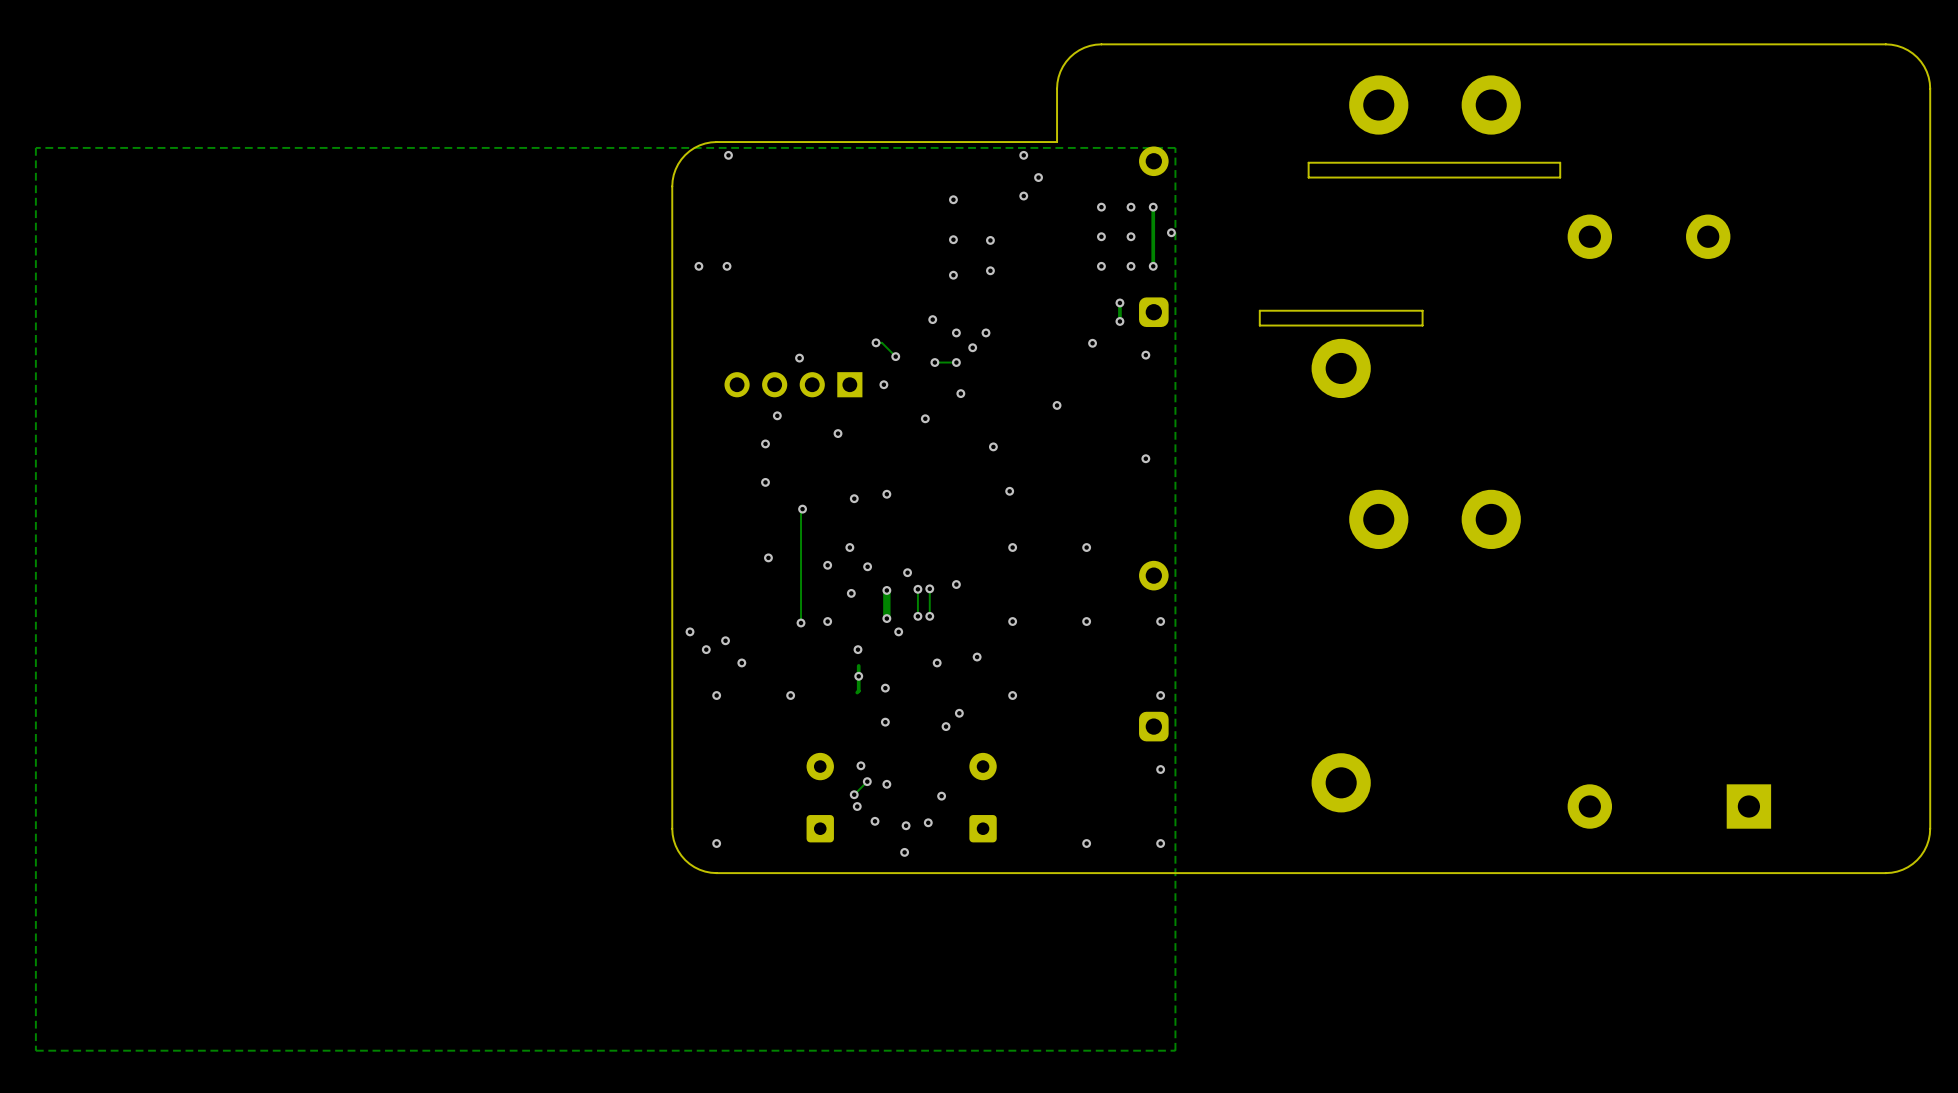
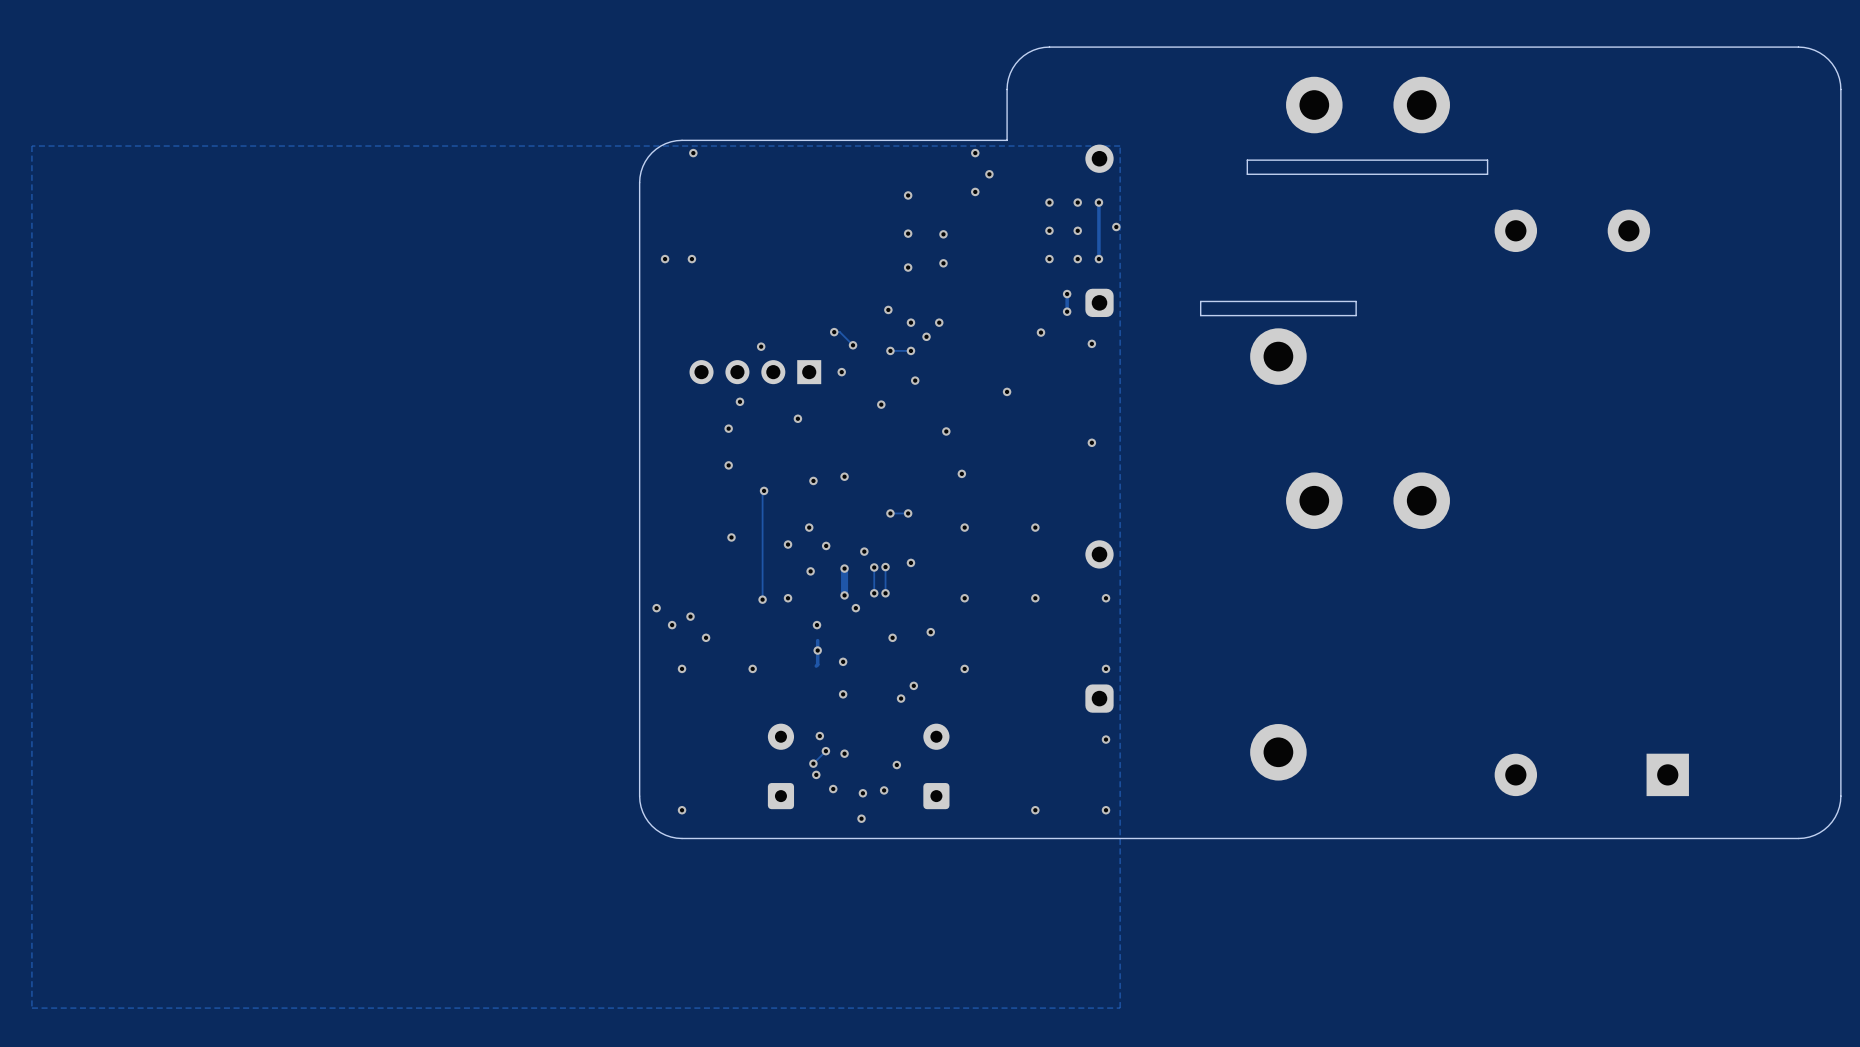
via: none -> (890, 513)
track: none -> (908, 513) (890, 513)
via: none -> (908, 513)

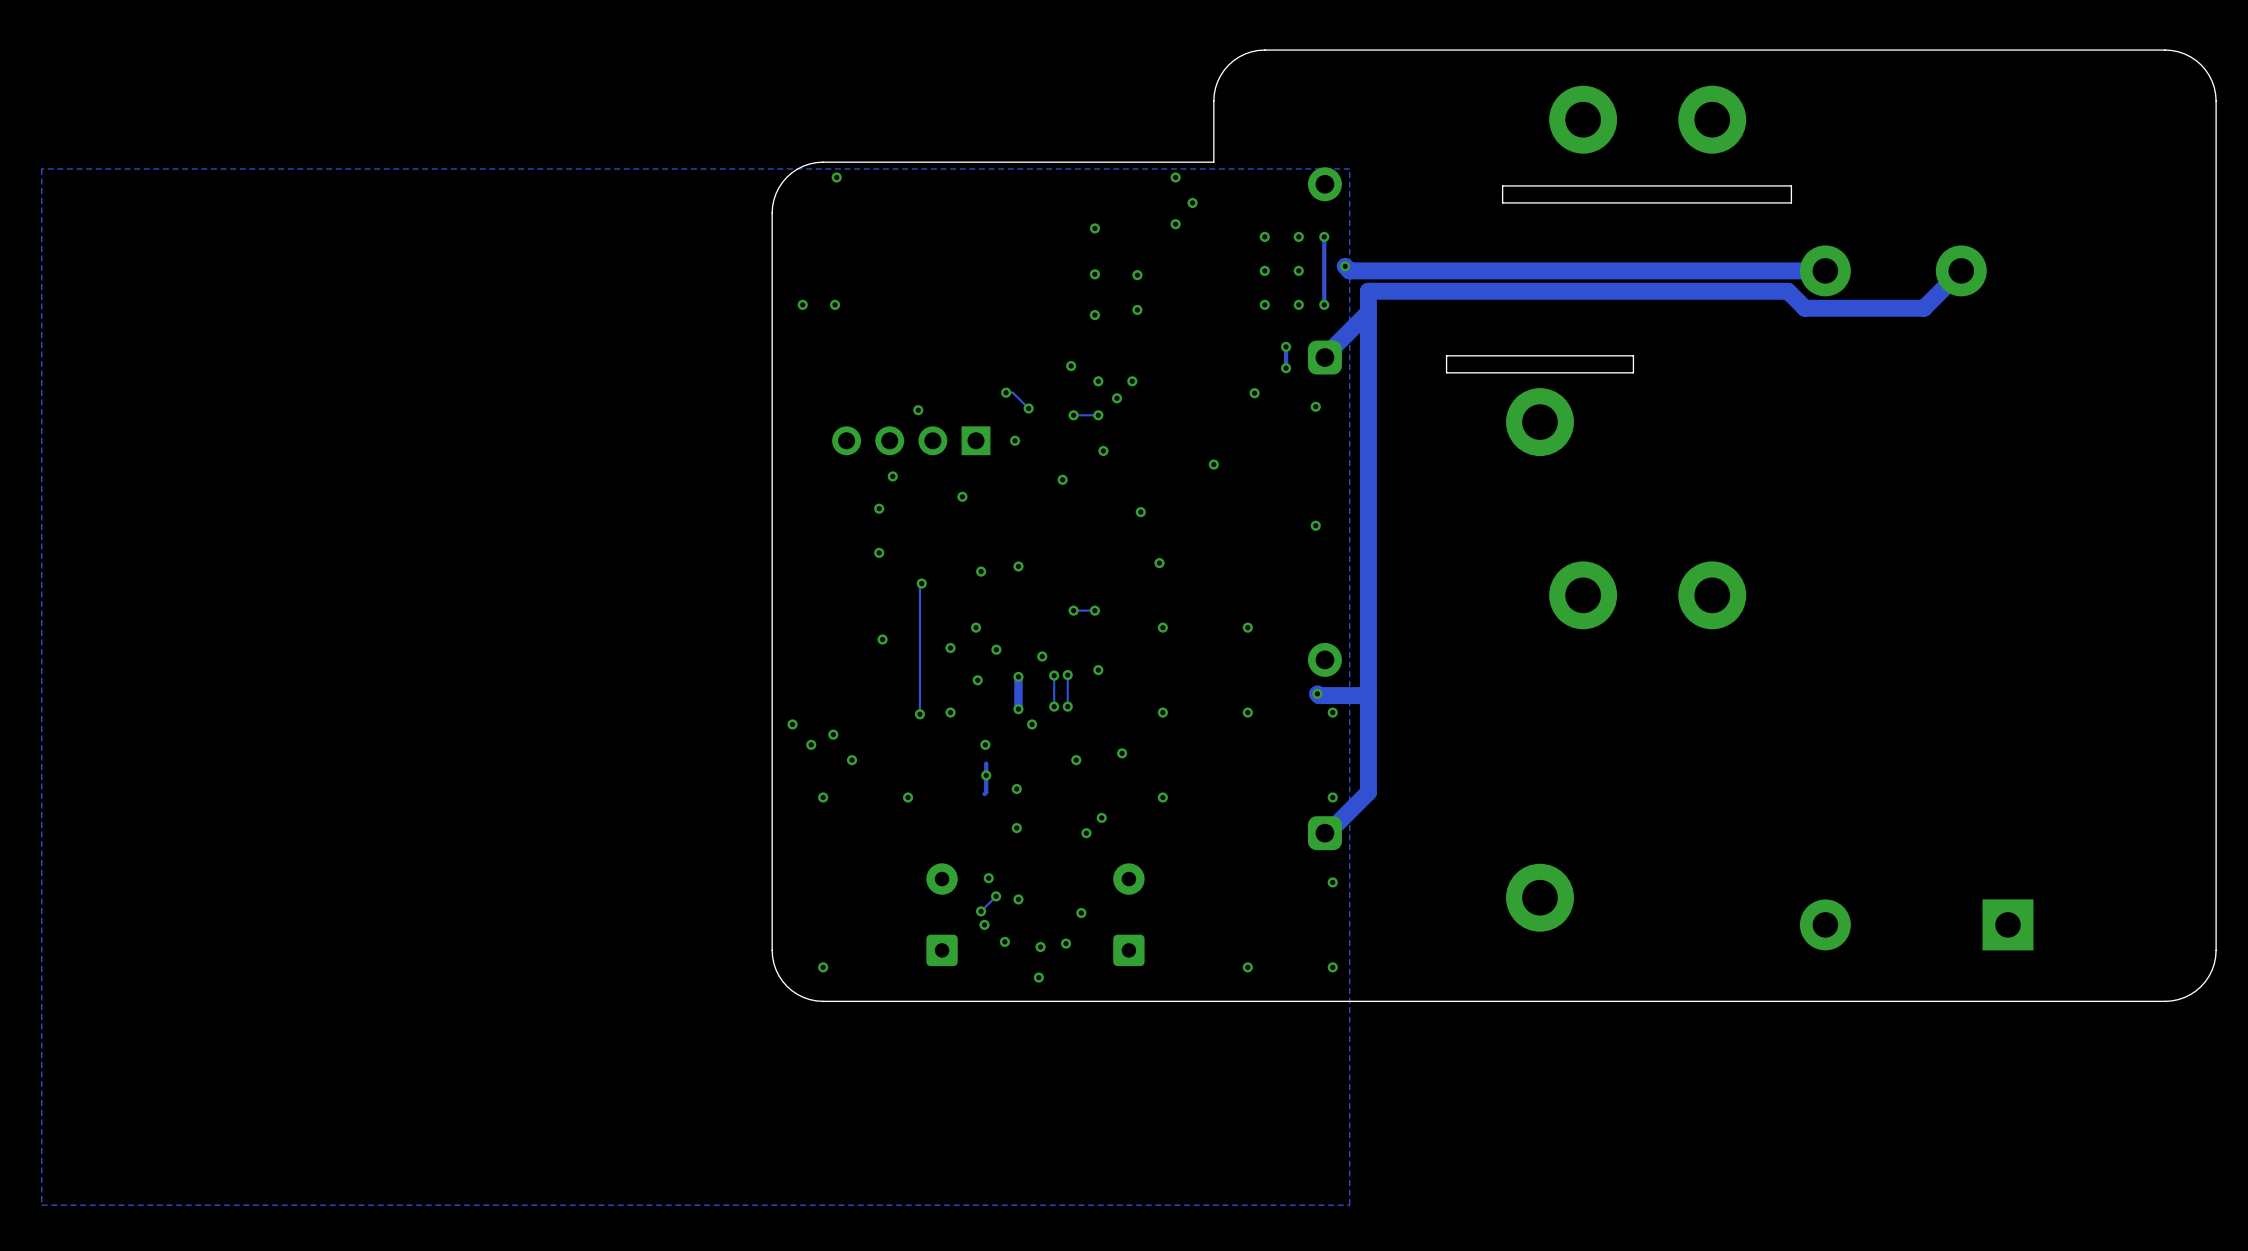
track: none -> (1345, 266) (1349, 270) (1825, 270)
track: none -> (1961, 270) (1923, 308) (1805, 308) (1788, 291) (1368, 291) (1368, 792) (1325, 835)
track: none -> (1368, 312) (1325, 355)
track: none -> (1317, 693) (1319, 695) (1368, 696)
via: none -> (1317, 693)

